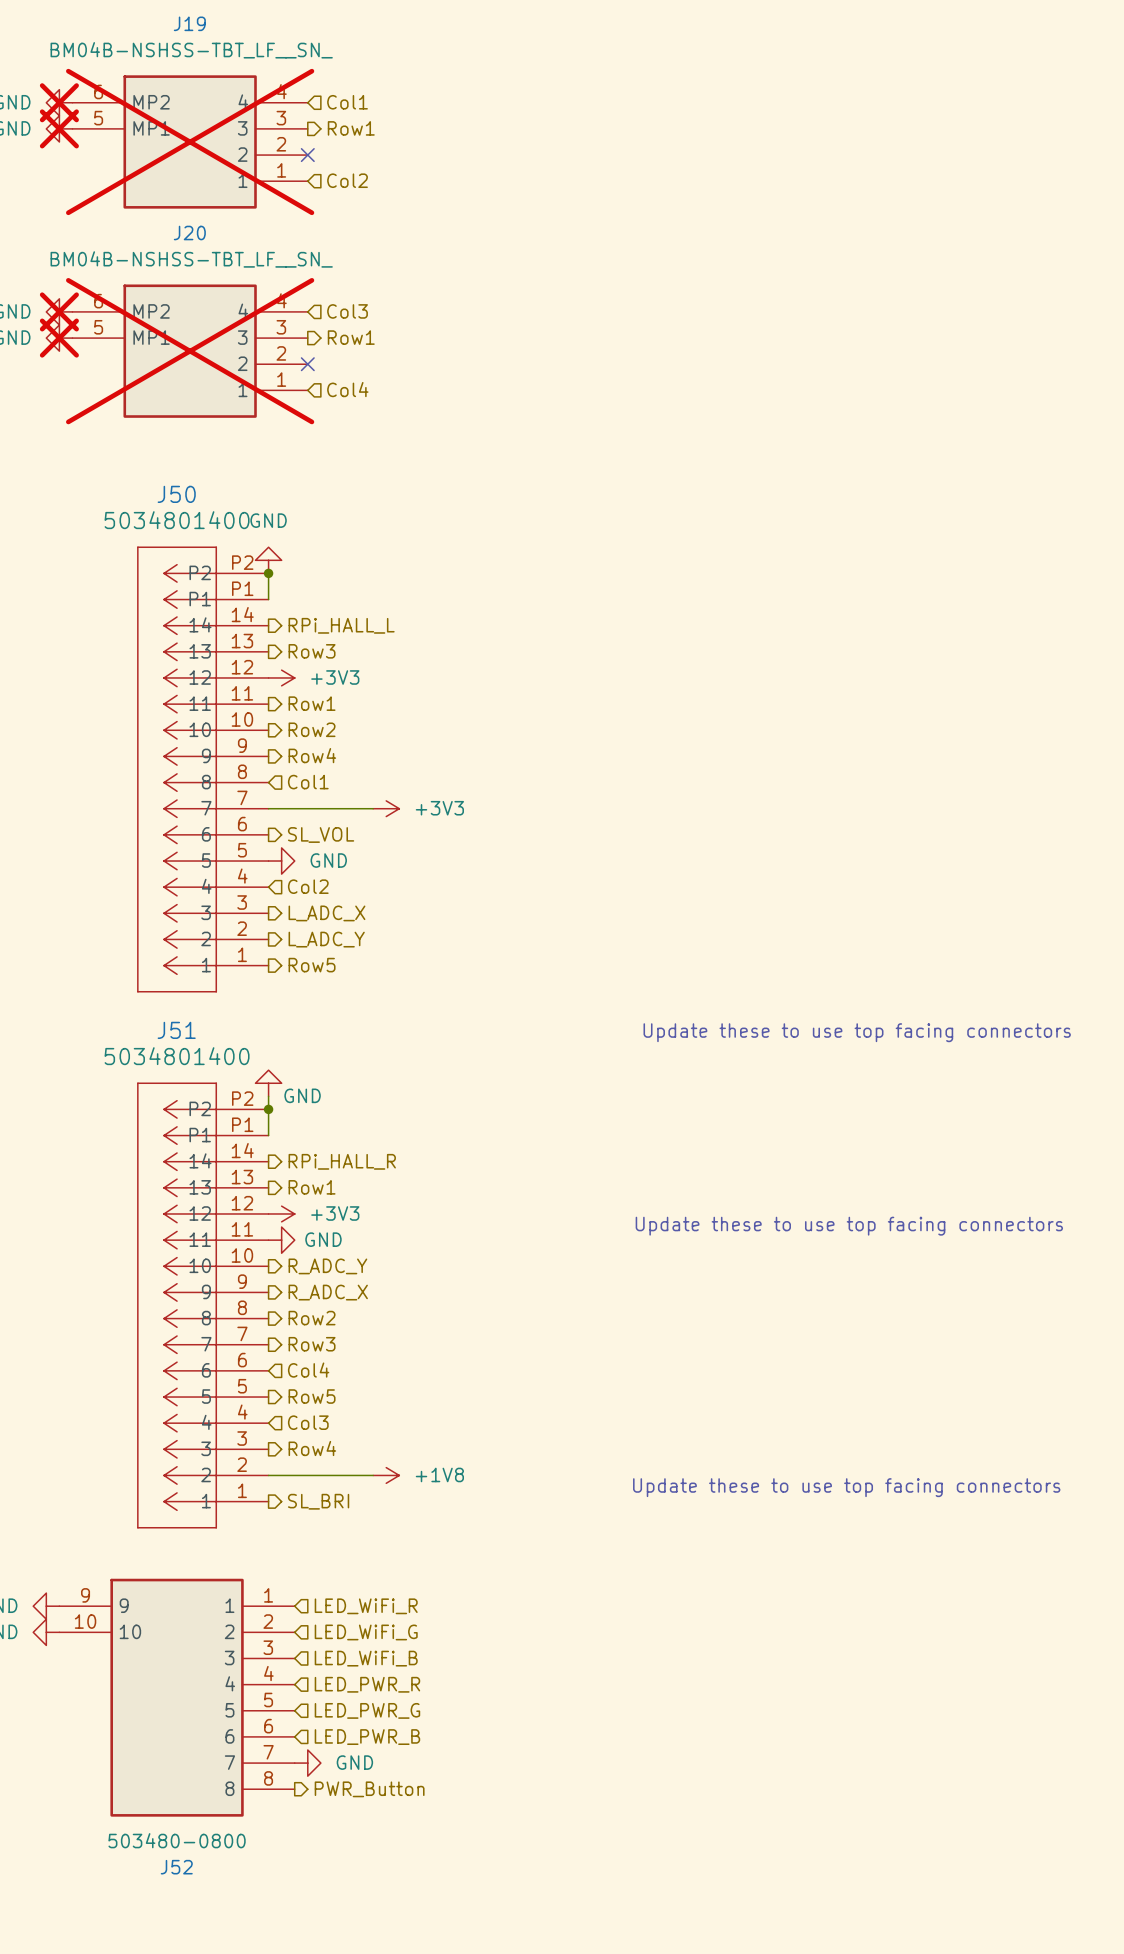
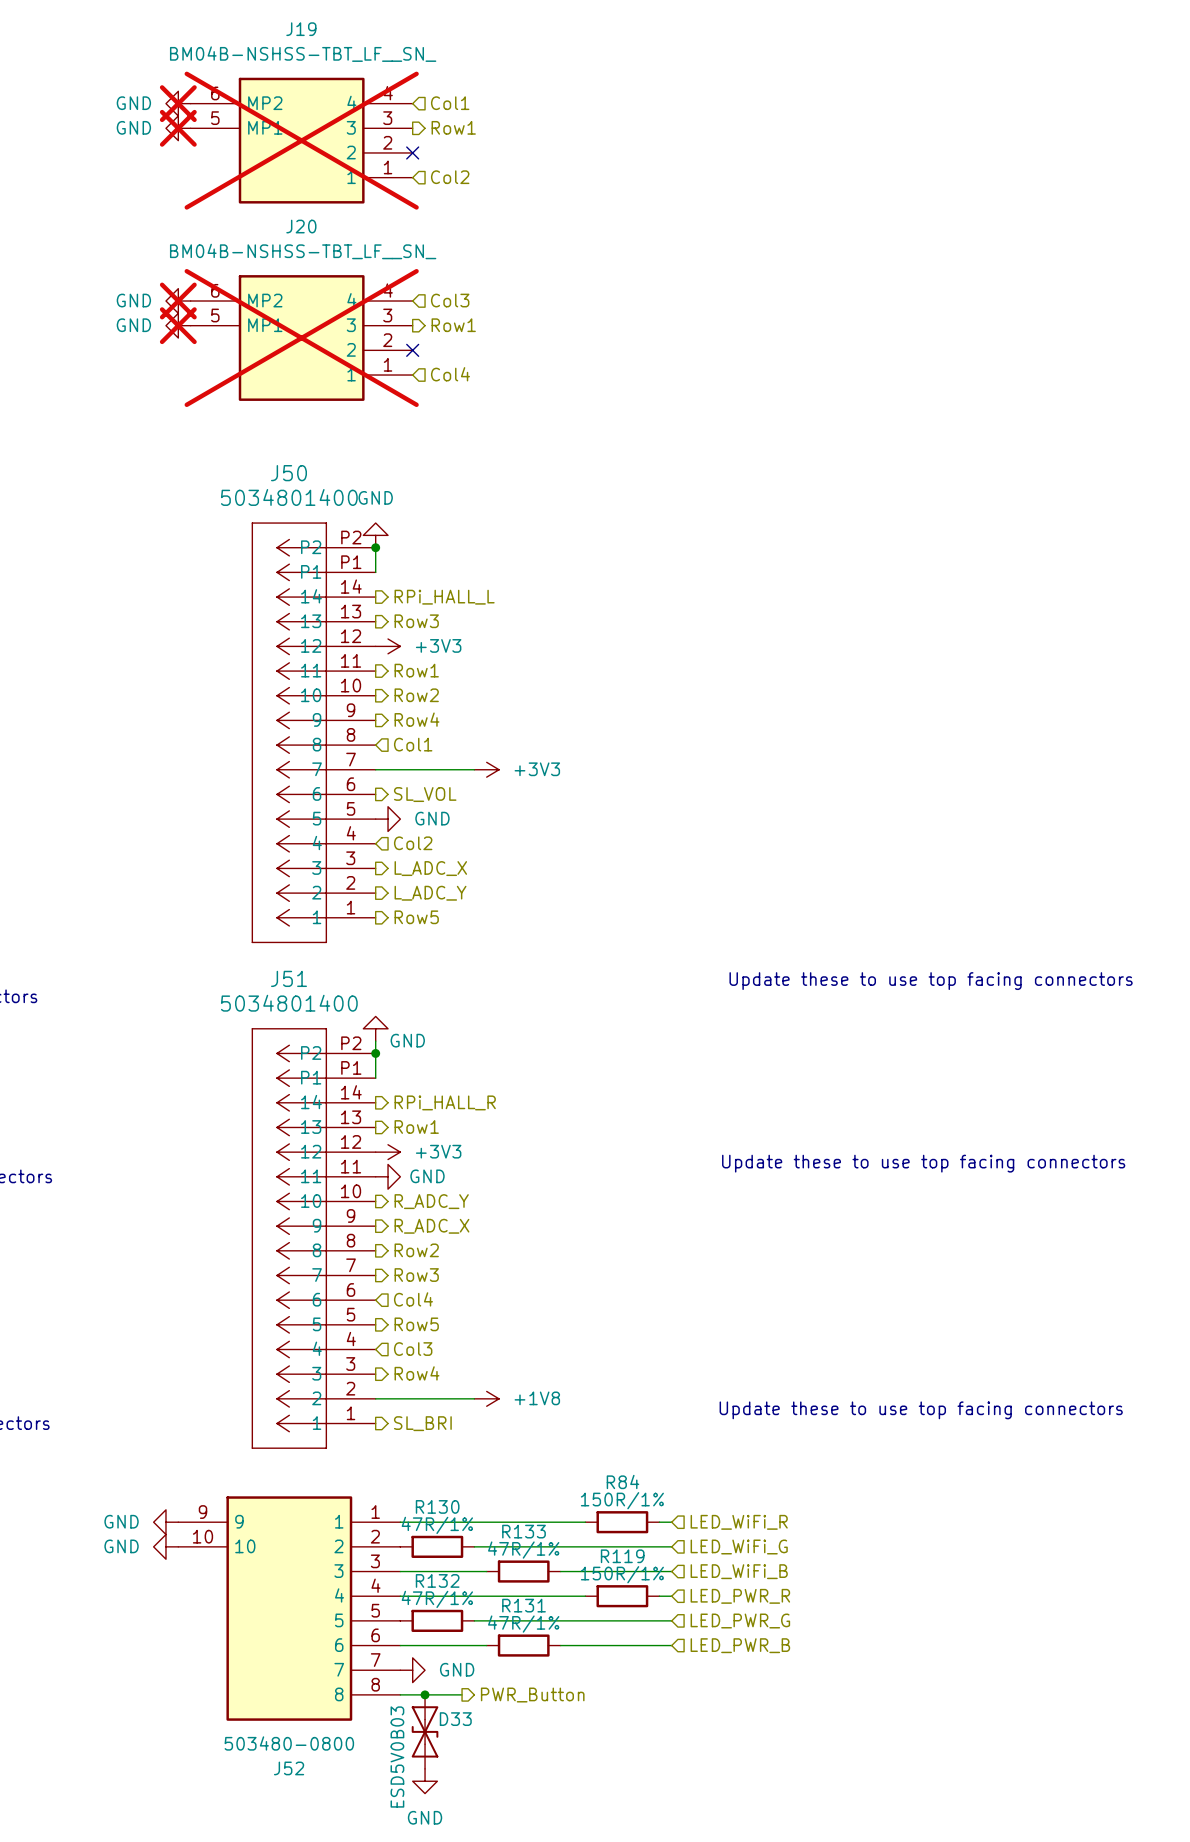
wire: none -> (400, 1522) (585, 1522)
hierarchical label: LED_WiFi_R (366, 1606) -> none
R84: none -> 150R/1% (622, 1522)
wire: none -> (659, 1522) (671, 1522)
hierarchical label: none -> LED_WiFi_R (739, 1522)
R130: none -> 47R/1% (437, 1546)
hierarchical label: LED_WiFi_G (366, 1632) -> none
wire: none -> (474, 1546) (671, 1546)
hierarchical label: none -> LED_WiFi_G (739, 1547)
wire: none -> (400, 1571) (486, 1571)
hierarchical label: LED_WiFi_B (366, 1658) -> none
R133: none -> 47R/1% (523, 1571)
wire: none -> (560, 1571) (671, 1571)
hierarchical label: none -> LED_WiFi_B (739, 1571)
wire: none -> (400, 1596) (585, 1596)
hierarchical label: LED_PWR_R (367, 1684) -> none
R119: none -> 150R/1% (622, 1596)
wire: none -> (659, 1596) (671, 1596)
hierarchical label: none -> LED_PWR_R (740, 1596)
R132: none -> 47R/1% (437, 1620)
hierarchical label: LED_PWR_G (367, 1710) -> none
wire: none -> (474, 1620) (671, 1620)
hierarchical label: none -> LED_PWR_G (740, 1621)
wire: none -> (400, 1645) (486, 1645)
R131: none -> 47R/1% (523, 1645)
wire: none -> (560, 1645) (671, 1645)
hierarchical label: LED_PWR_B (367, 1737) -> none
hierarchical label: none -> LED_PWR_B (740, 1645)
wire: none -> (400, 1694) (462, 1694)
junction: none -> (425, 1694)
hierarchical label position: PWR_Button (369, 1789) -> PWR_Button (532, 1695)
D33: none -> ESD5V0B03 (425, 1731)
power symbol: none -> GND (425, 1781)

